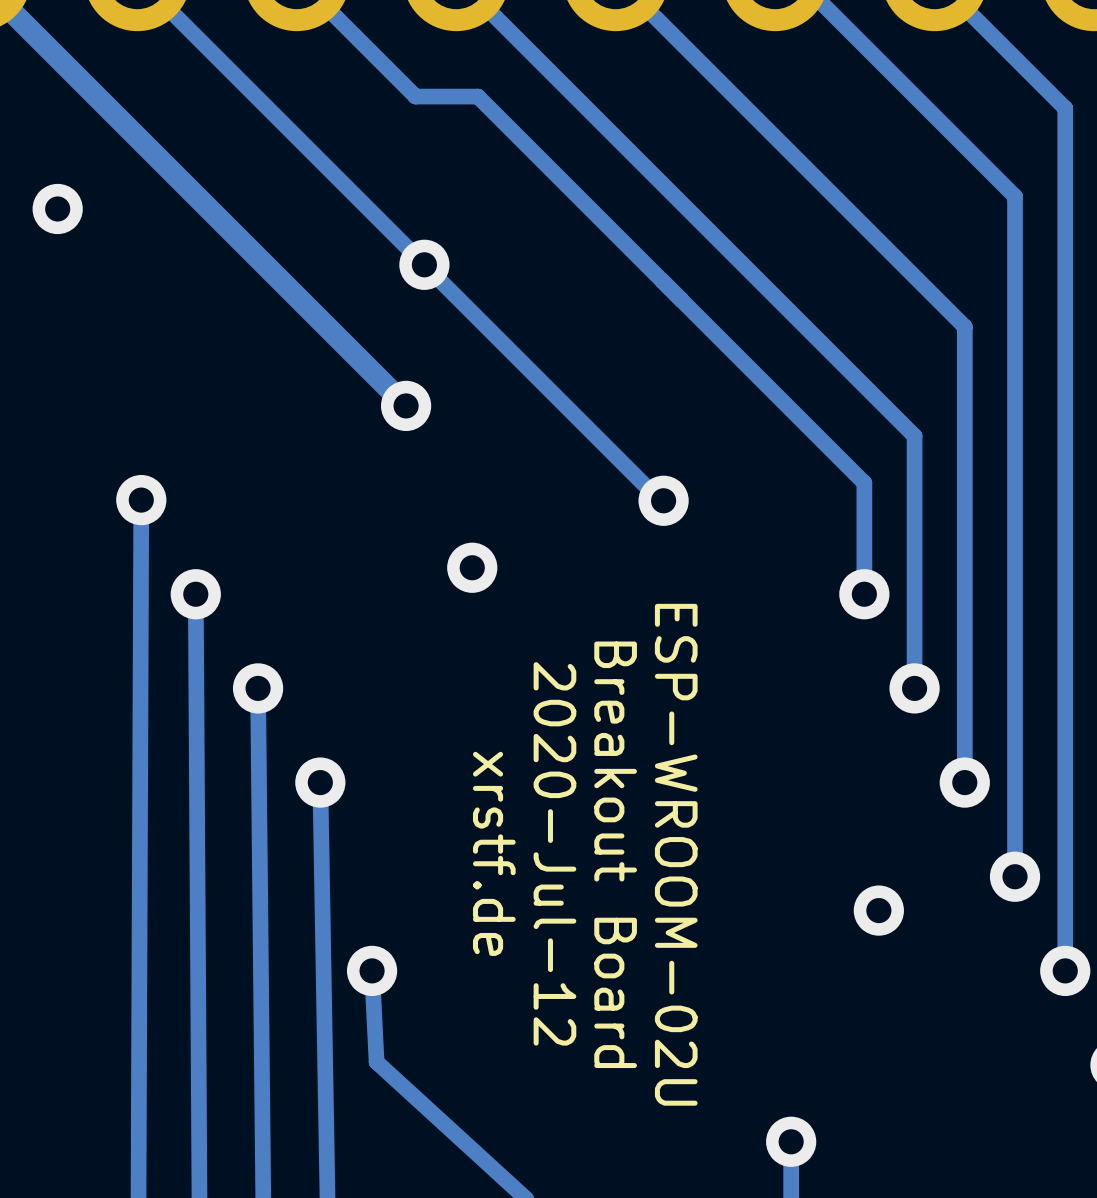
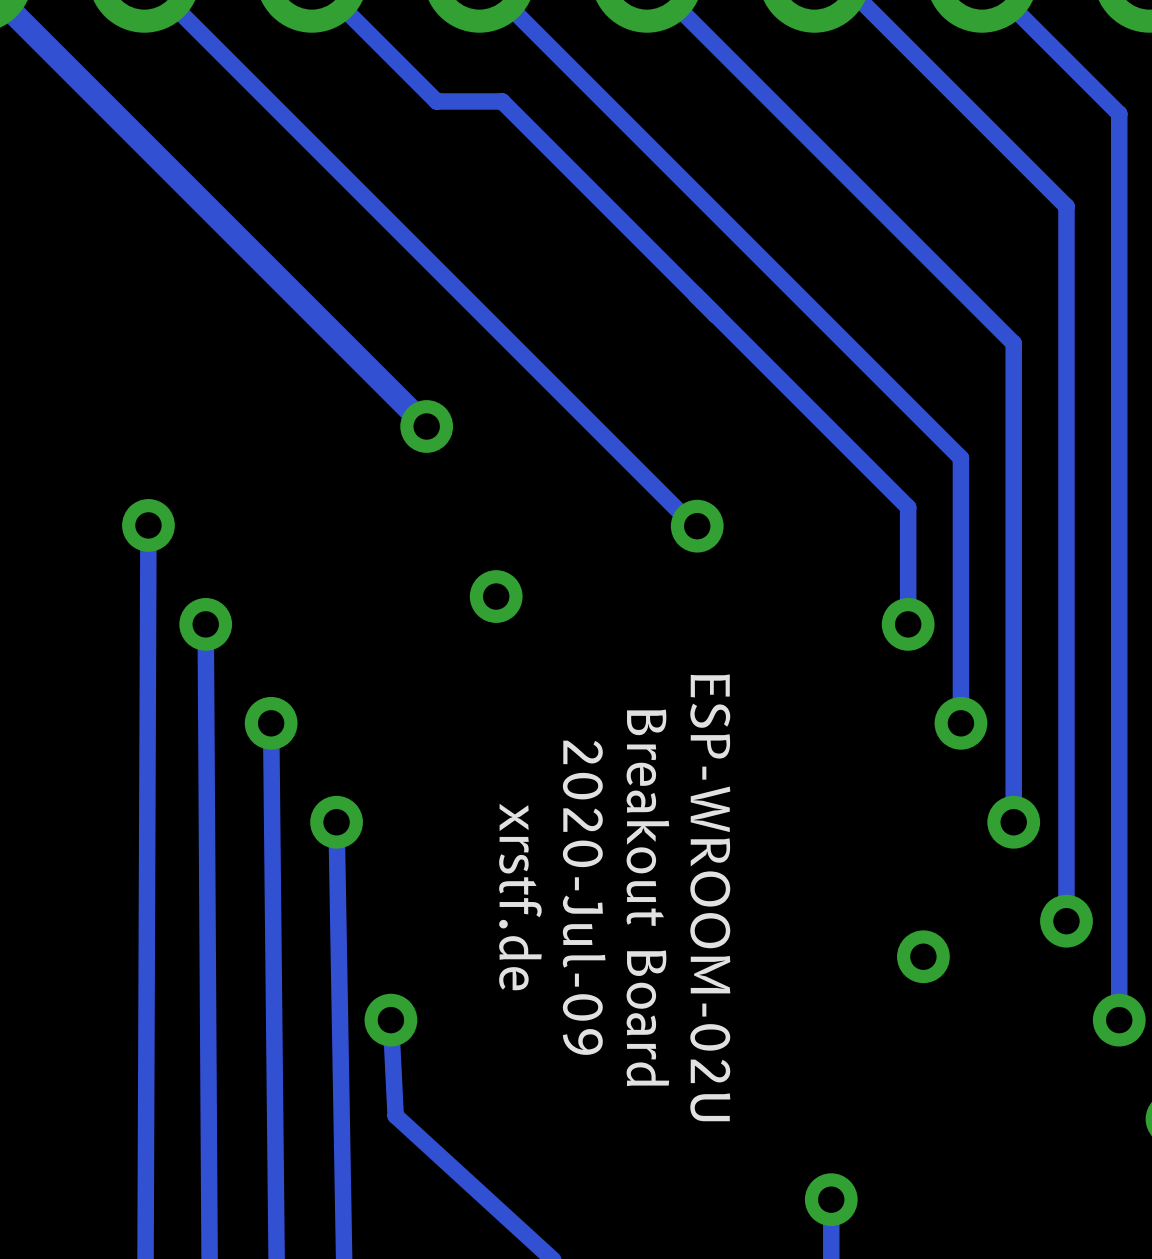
via: (57, 208) -> none
via: (424, 264) -> none
text: 2020-Jul-12 (554, 853) -> 2020-Jul-09 (584, 897)

